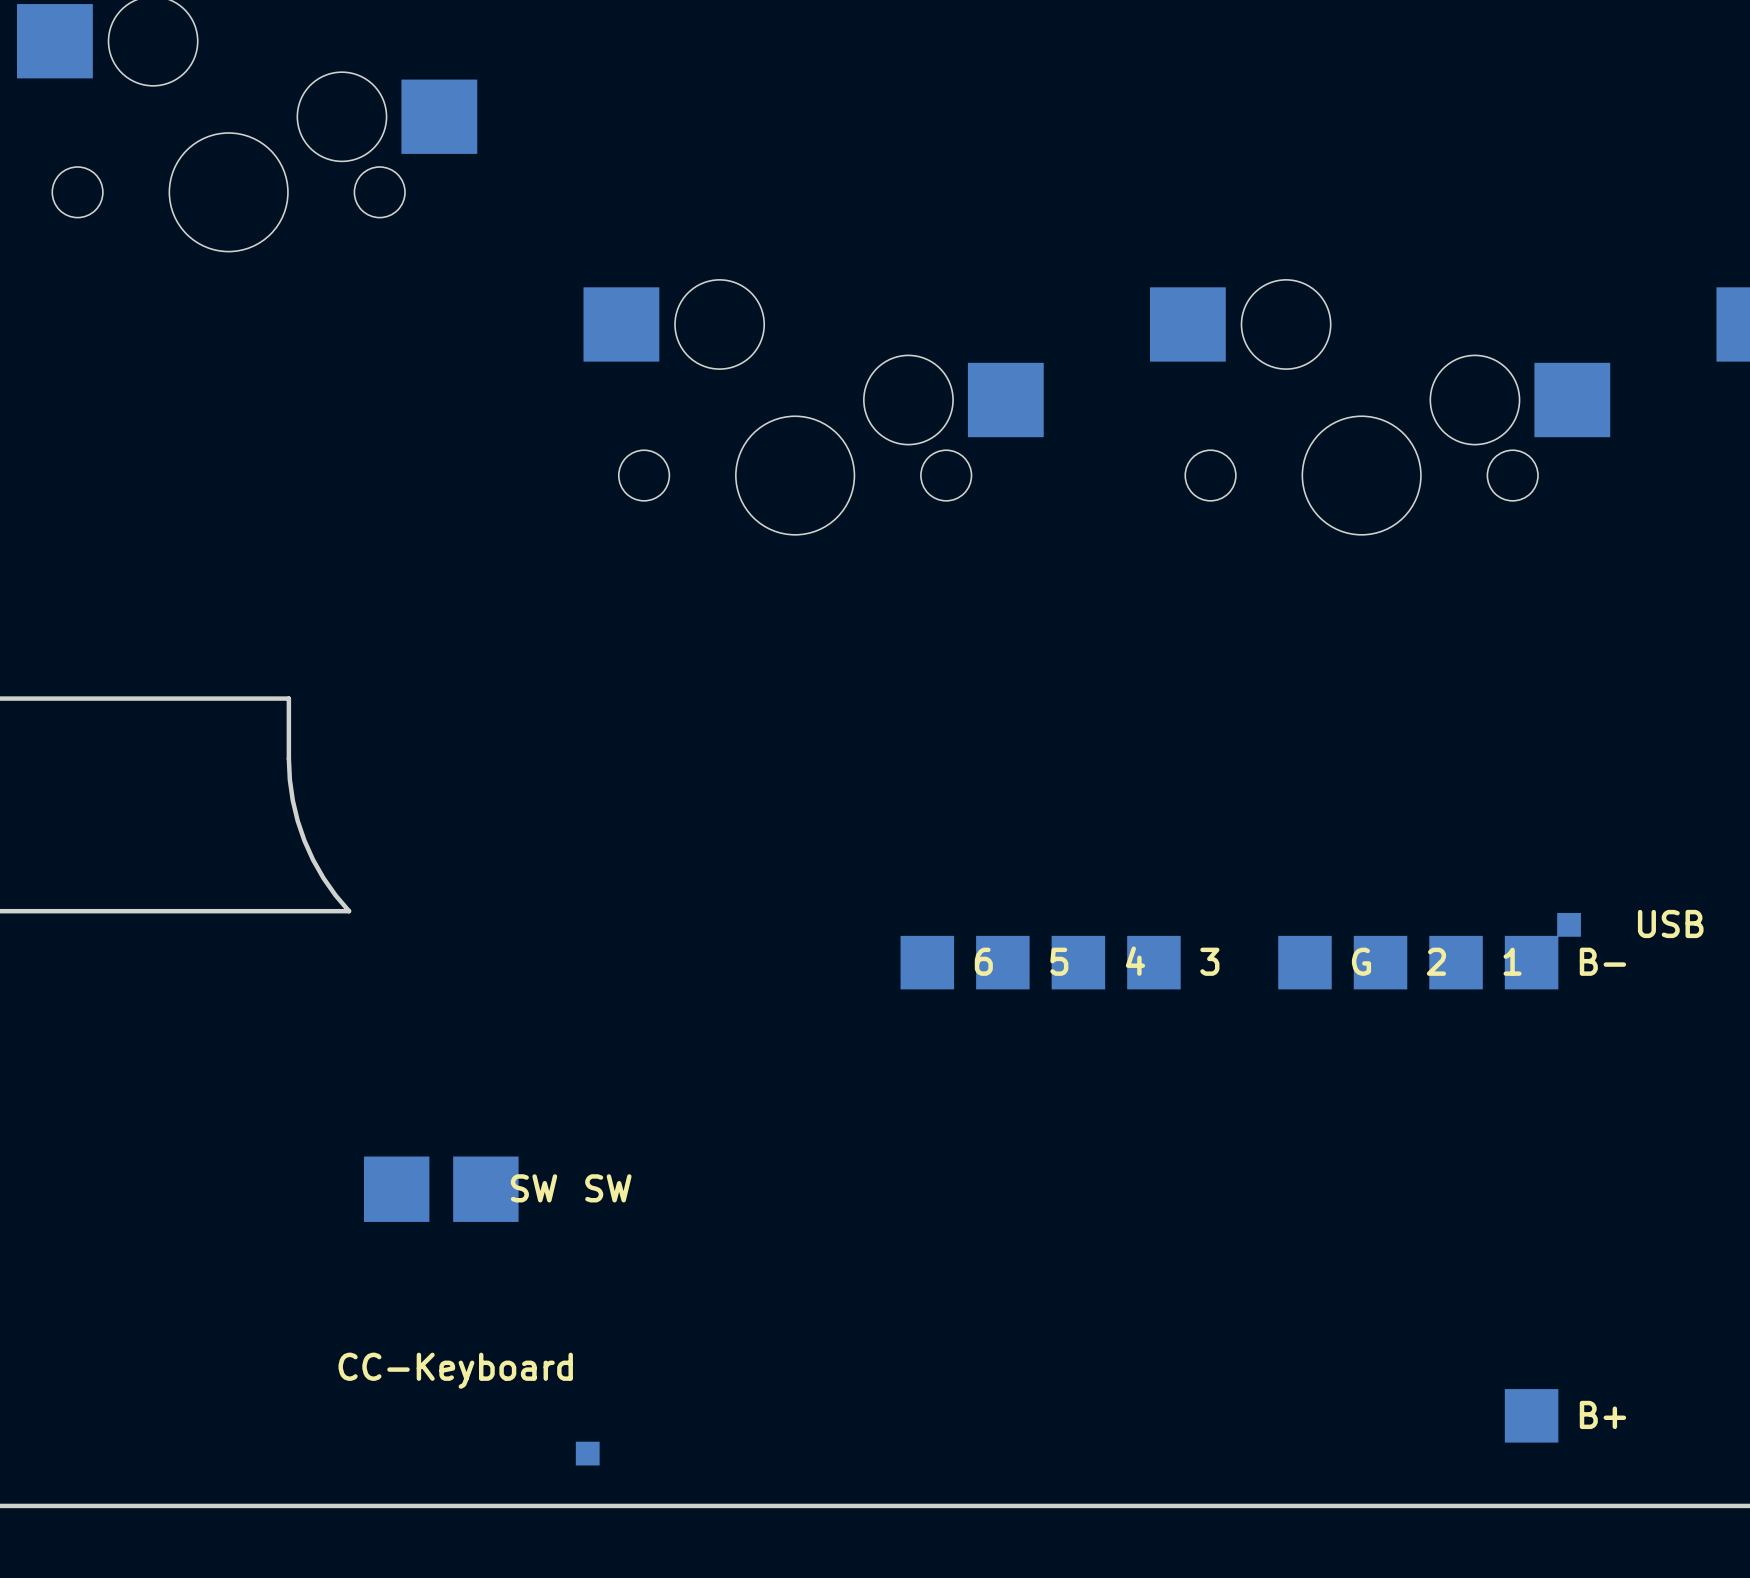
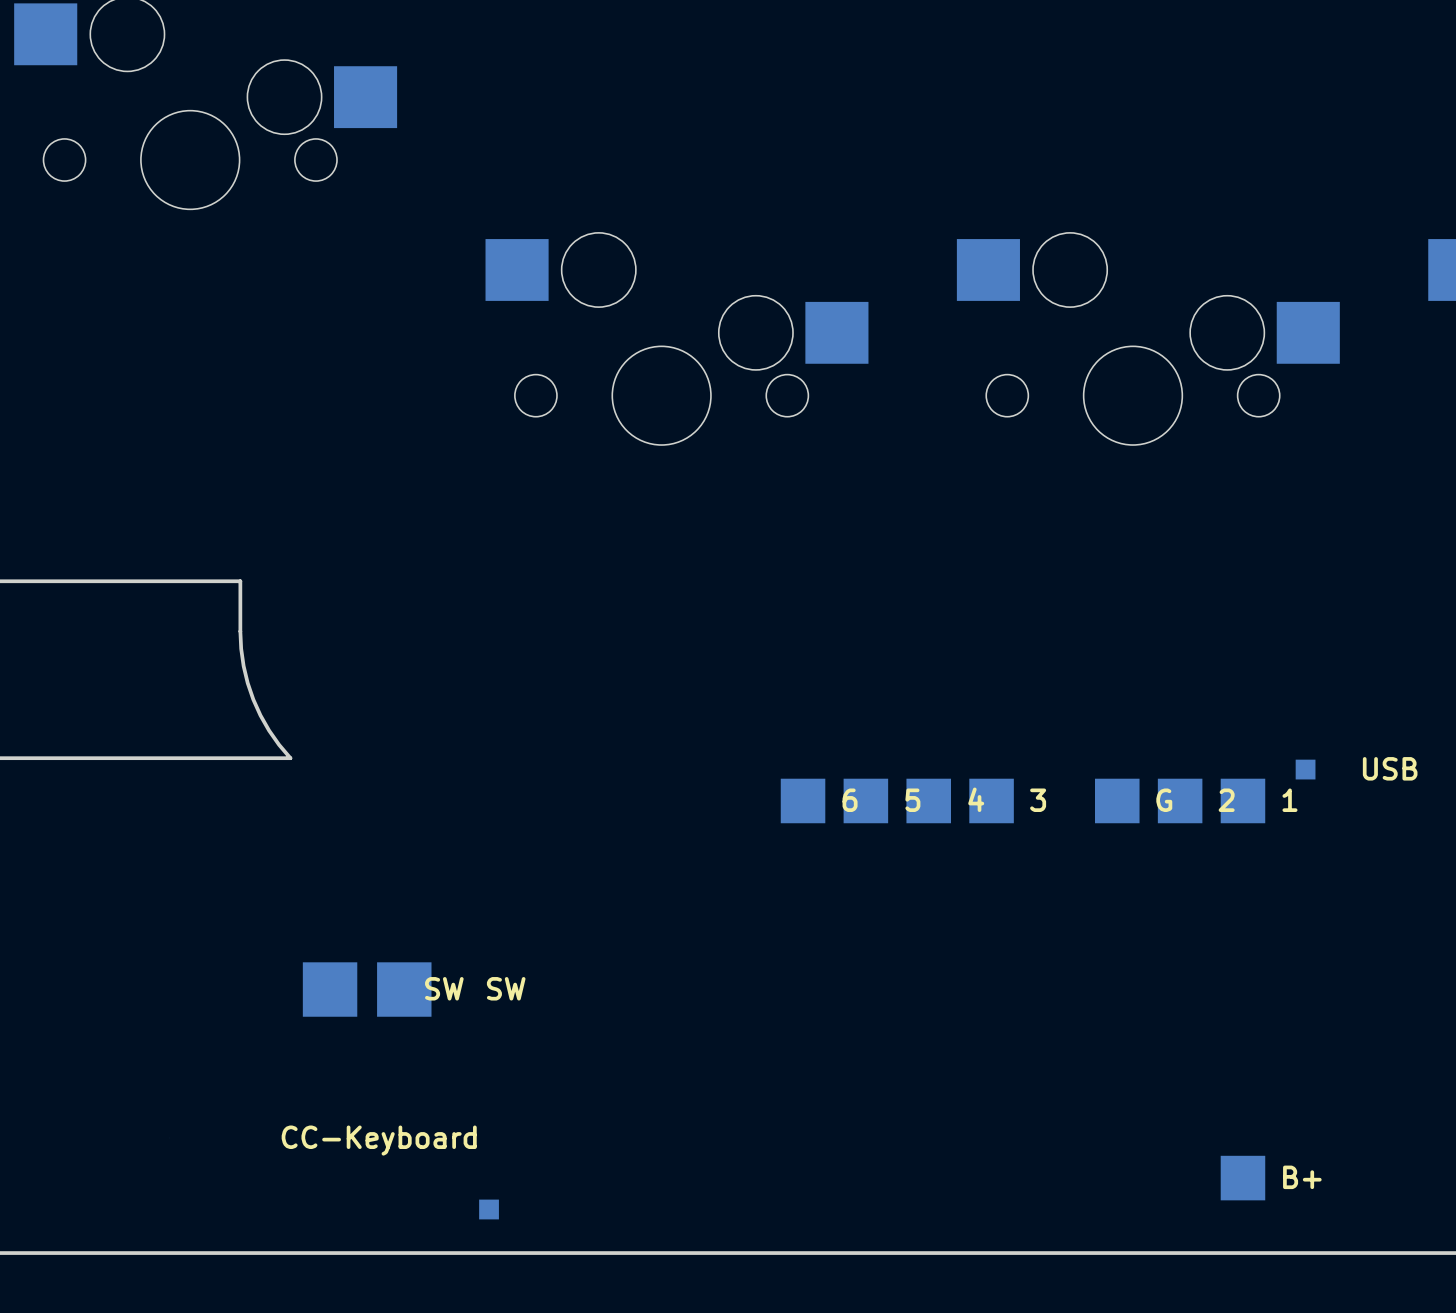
part position: (927, 962) -> (803, 800)
part position: (1002, 962) -> (865, 800)
part position: (1078, 962) -> (928, 800)
part position: (1153, 962) -> (991, 800)
part position: (1304, 962) -> (1117, 800)
part position: (1380, 962) -> (1180, 800)
part position: (1456, 962) -> (1242, 800)
part: (1531, 962) -> none
part position: (1531, 1415) -> (1242, 1178)

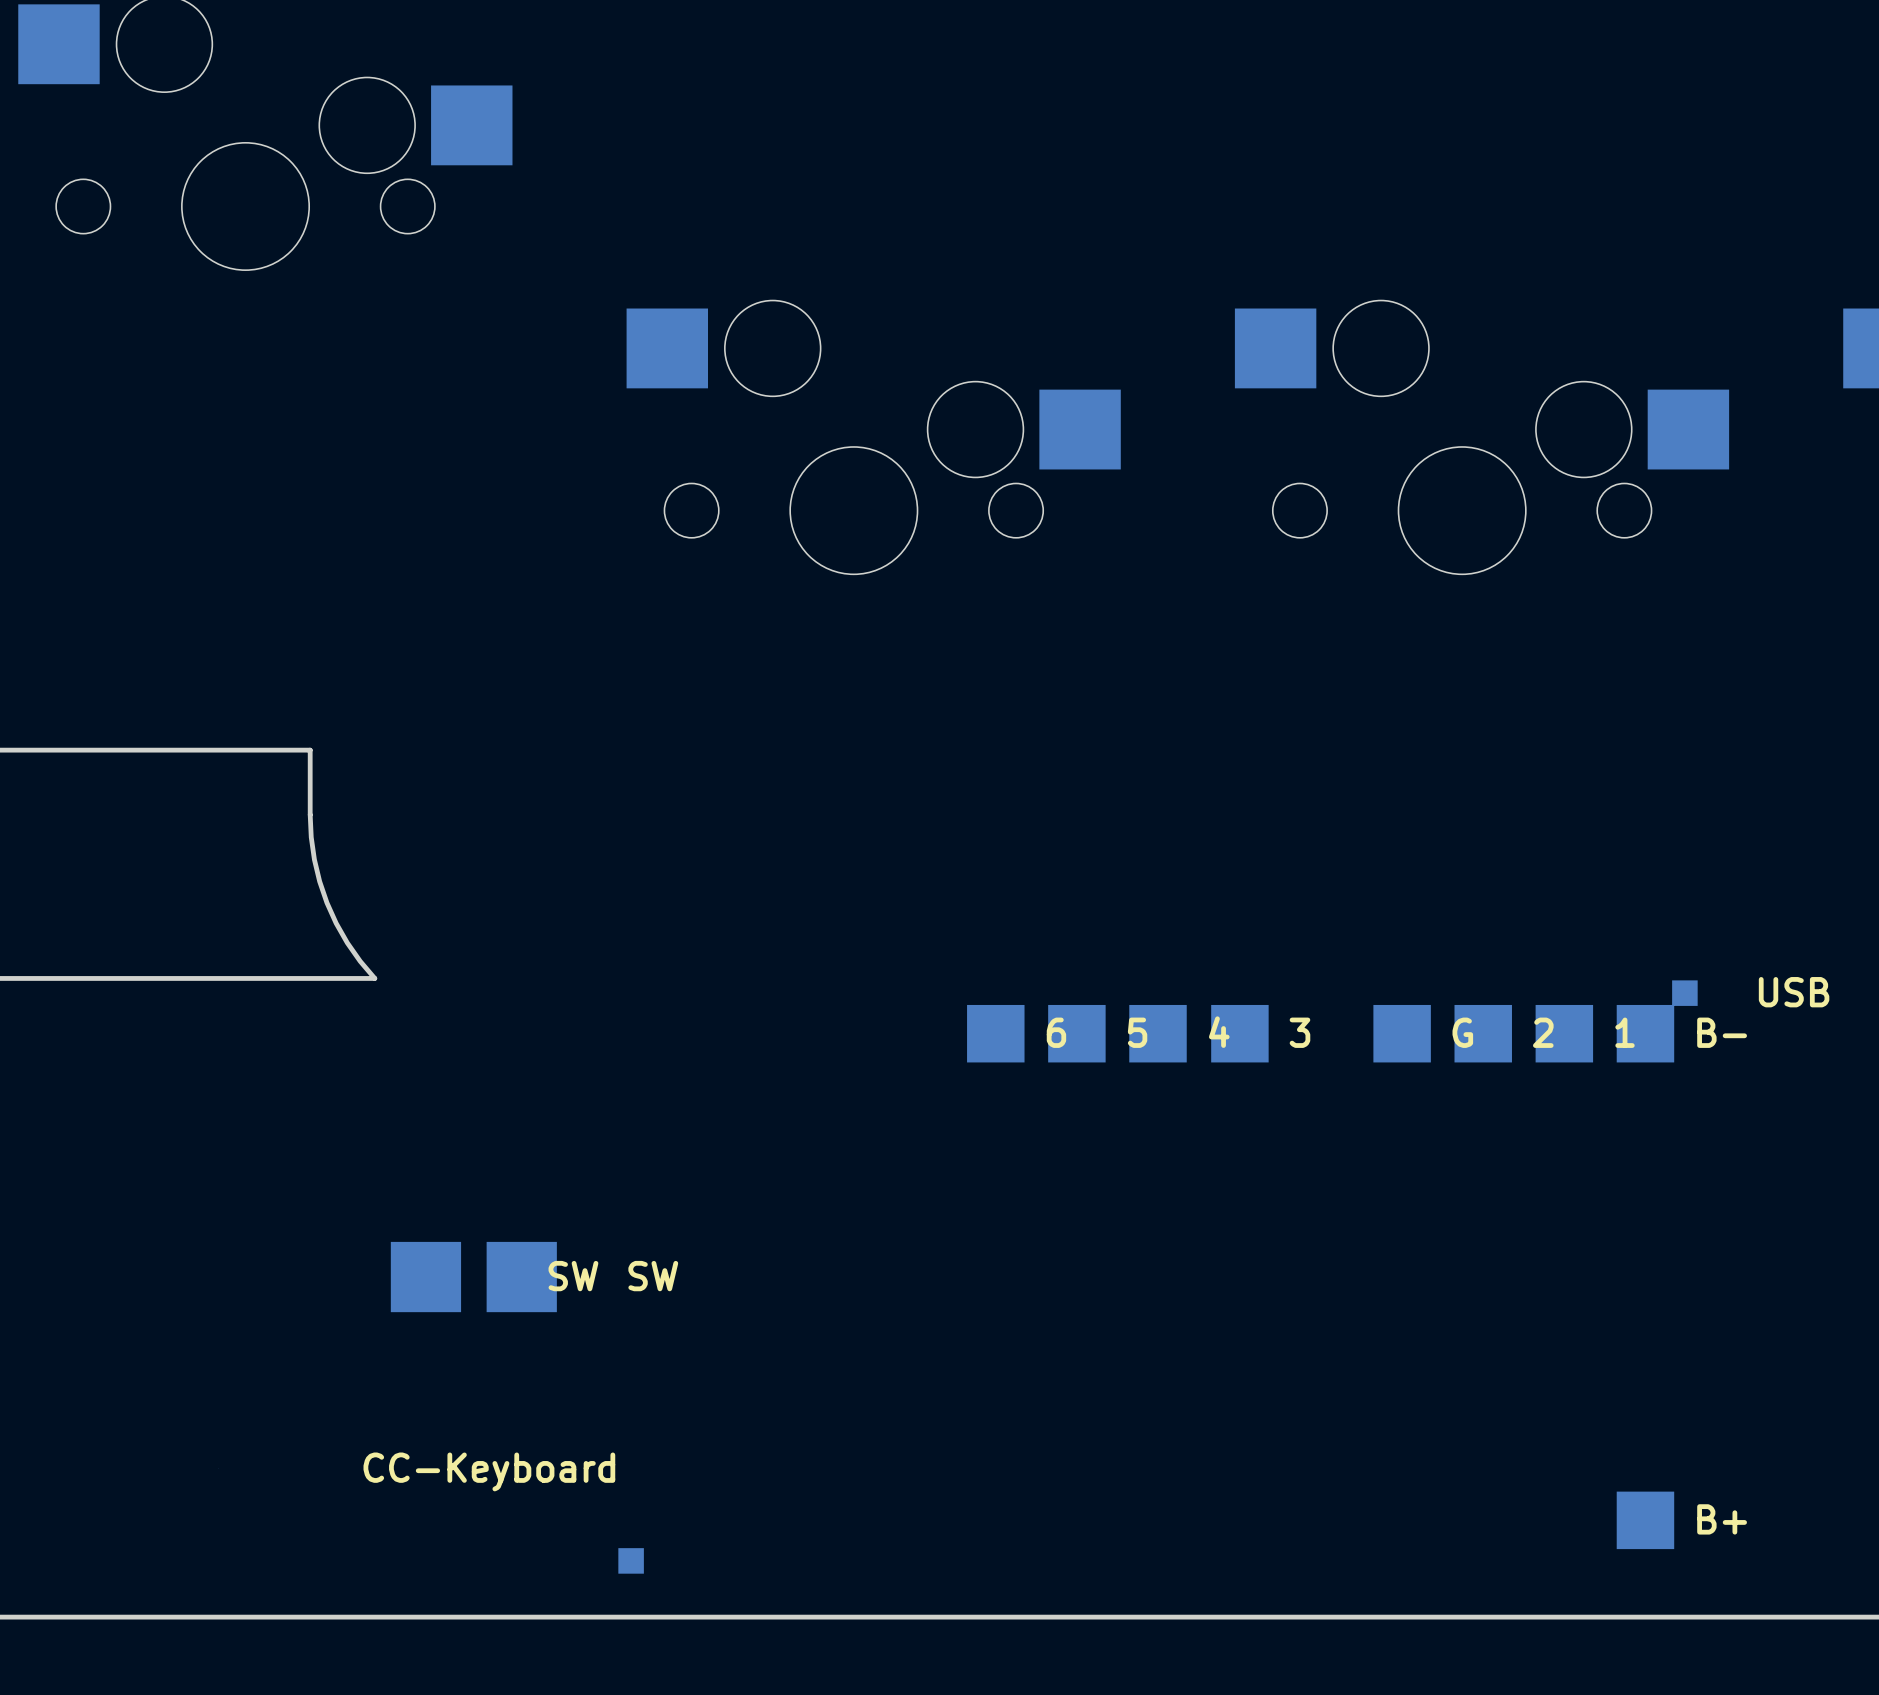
part position: (803, 800) -> (995, 1033)
part position: (865, 800) -> (1076, 1033)
part position: (928, 800) -> (1158, 1033)
part position: (991, 800) -> (1239, 1033)
part position: (1117, 800) -> (1402, 1033)
part position: (1180, 800) -> (1483, 1033)
part position: (1242, 800) -> (1564, 1033)
part: none -> (1645, 1033)
part position: (1242, 1178) -> (1645, 1520)

